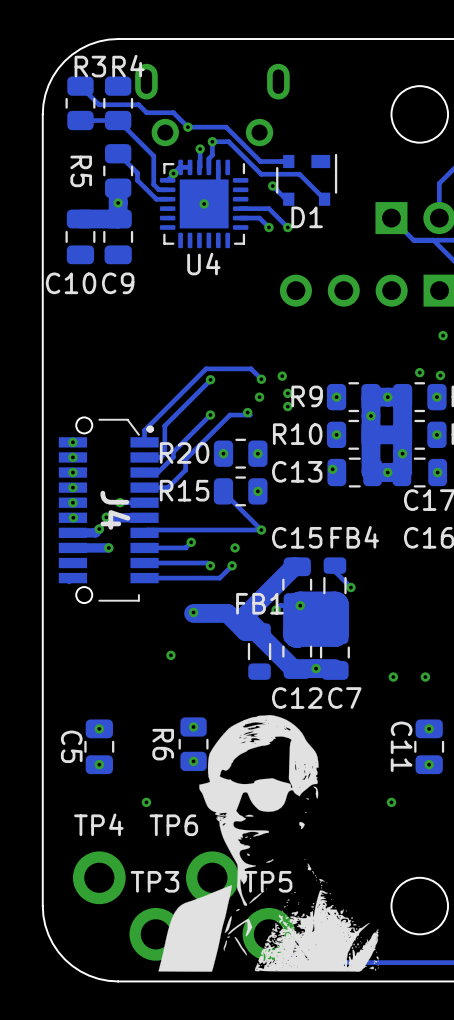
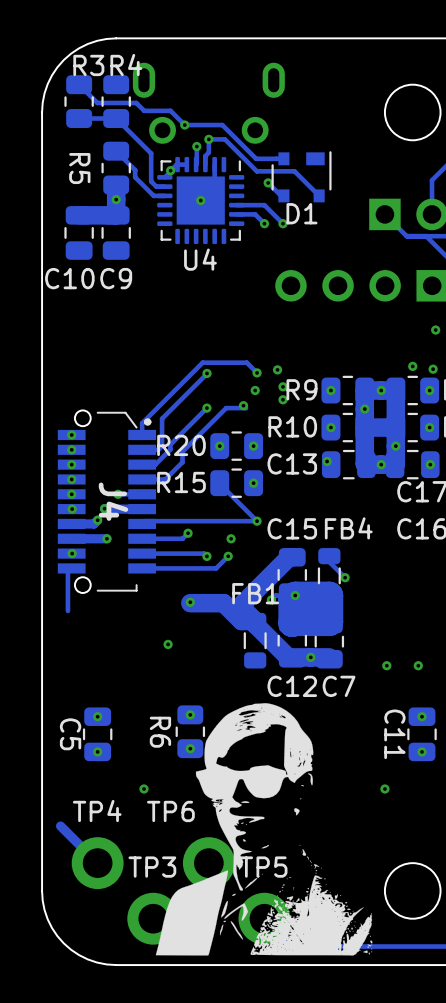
via: none -> (72, 553)
track: none -> (67, 572) (67, 610)
track: none -> (60, 826) (97, 863)

